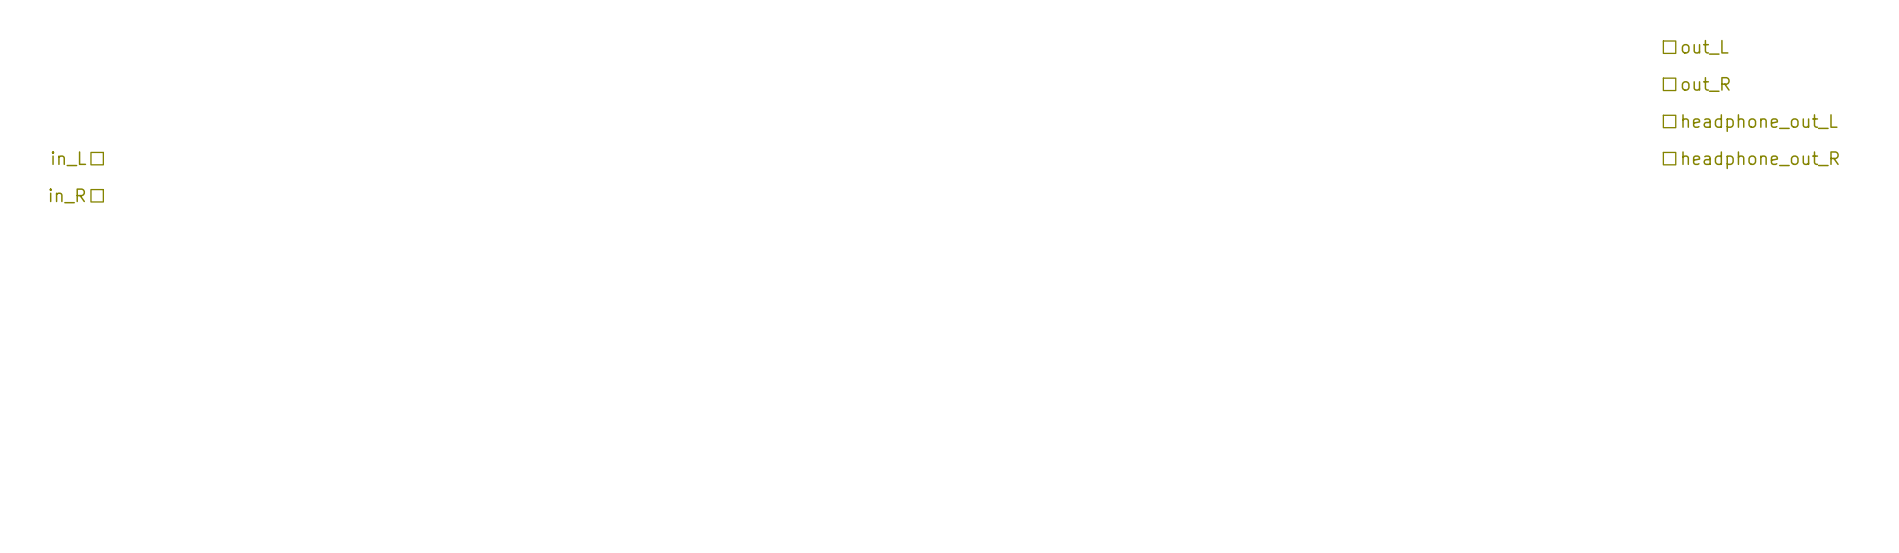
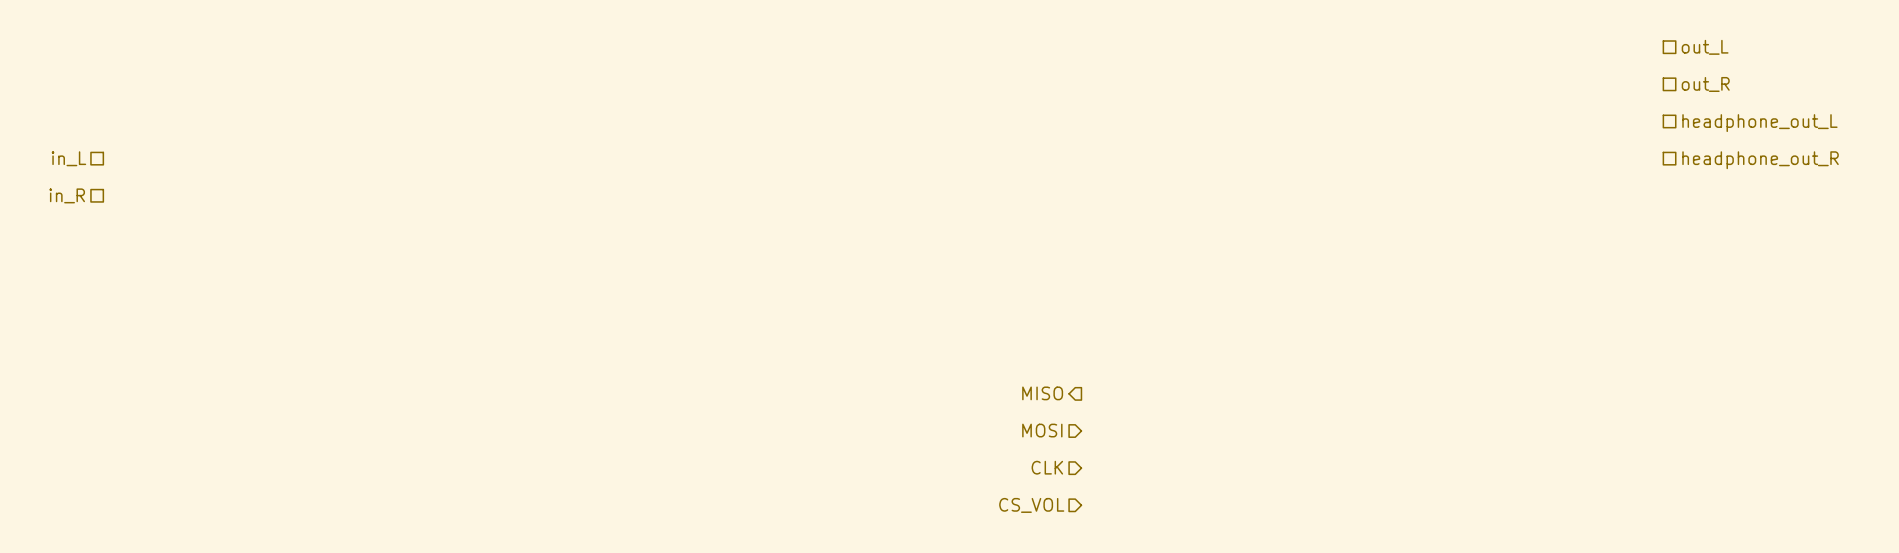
hierarchical label: none -> MISO (1042, 393)
hierarchical label: none -> MOSI (1042, 430)
hierarchical label: none -> CLK (1047, 467)
hierarchical label: none -> CS_VOL (1031, 505)

